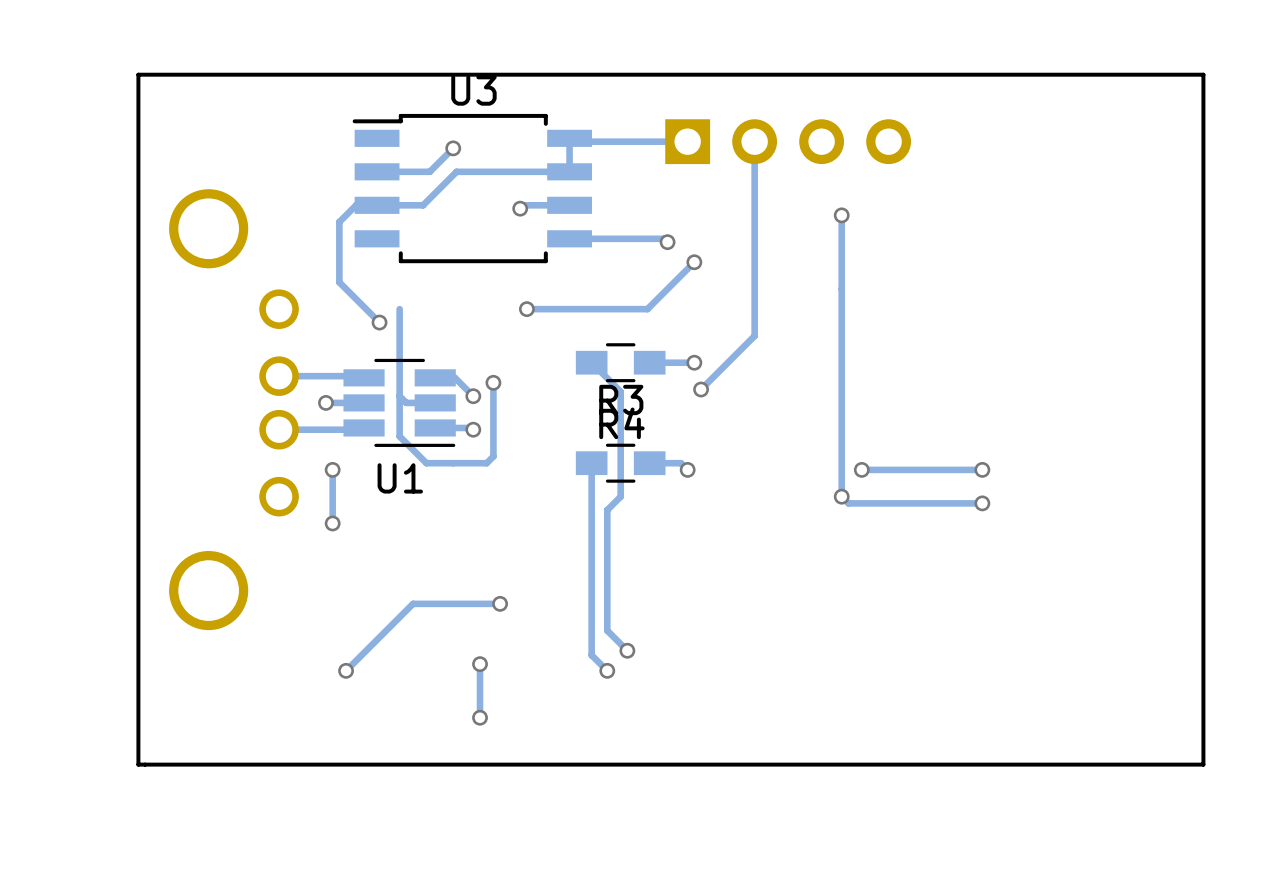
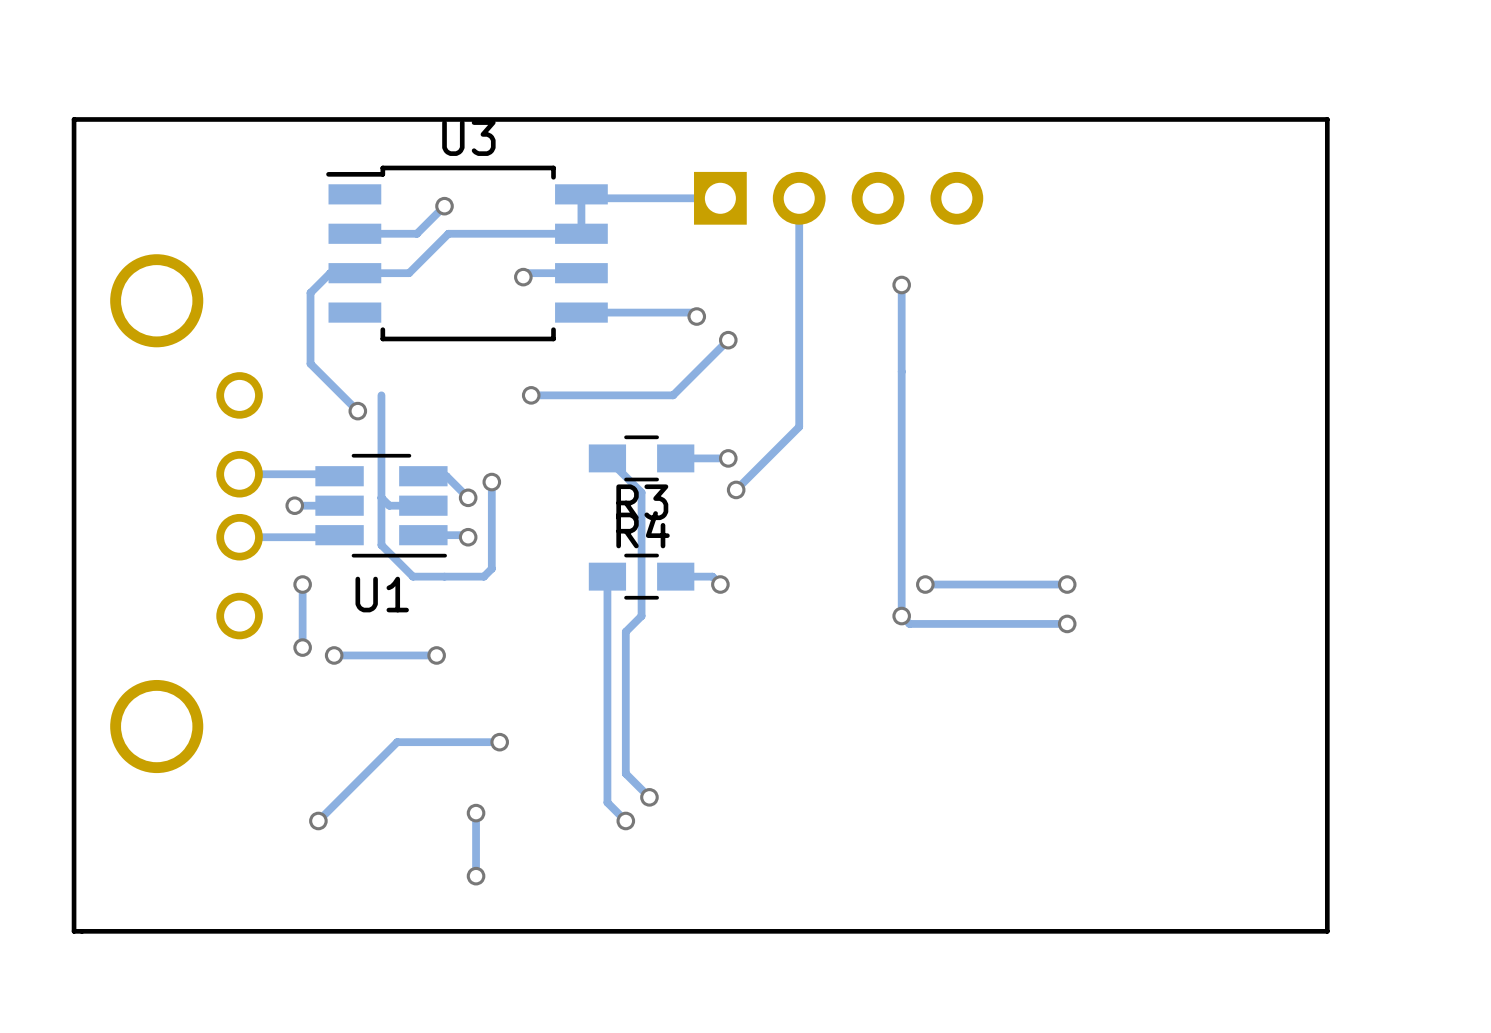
via: none -> (334, 655)
track: none -> (436, 655) (334, 655)
via: none -> (436, 655)

